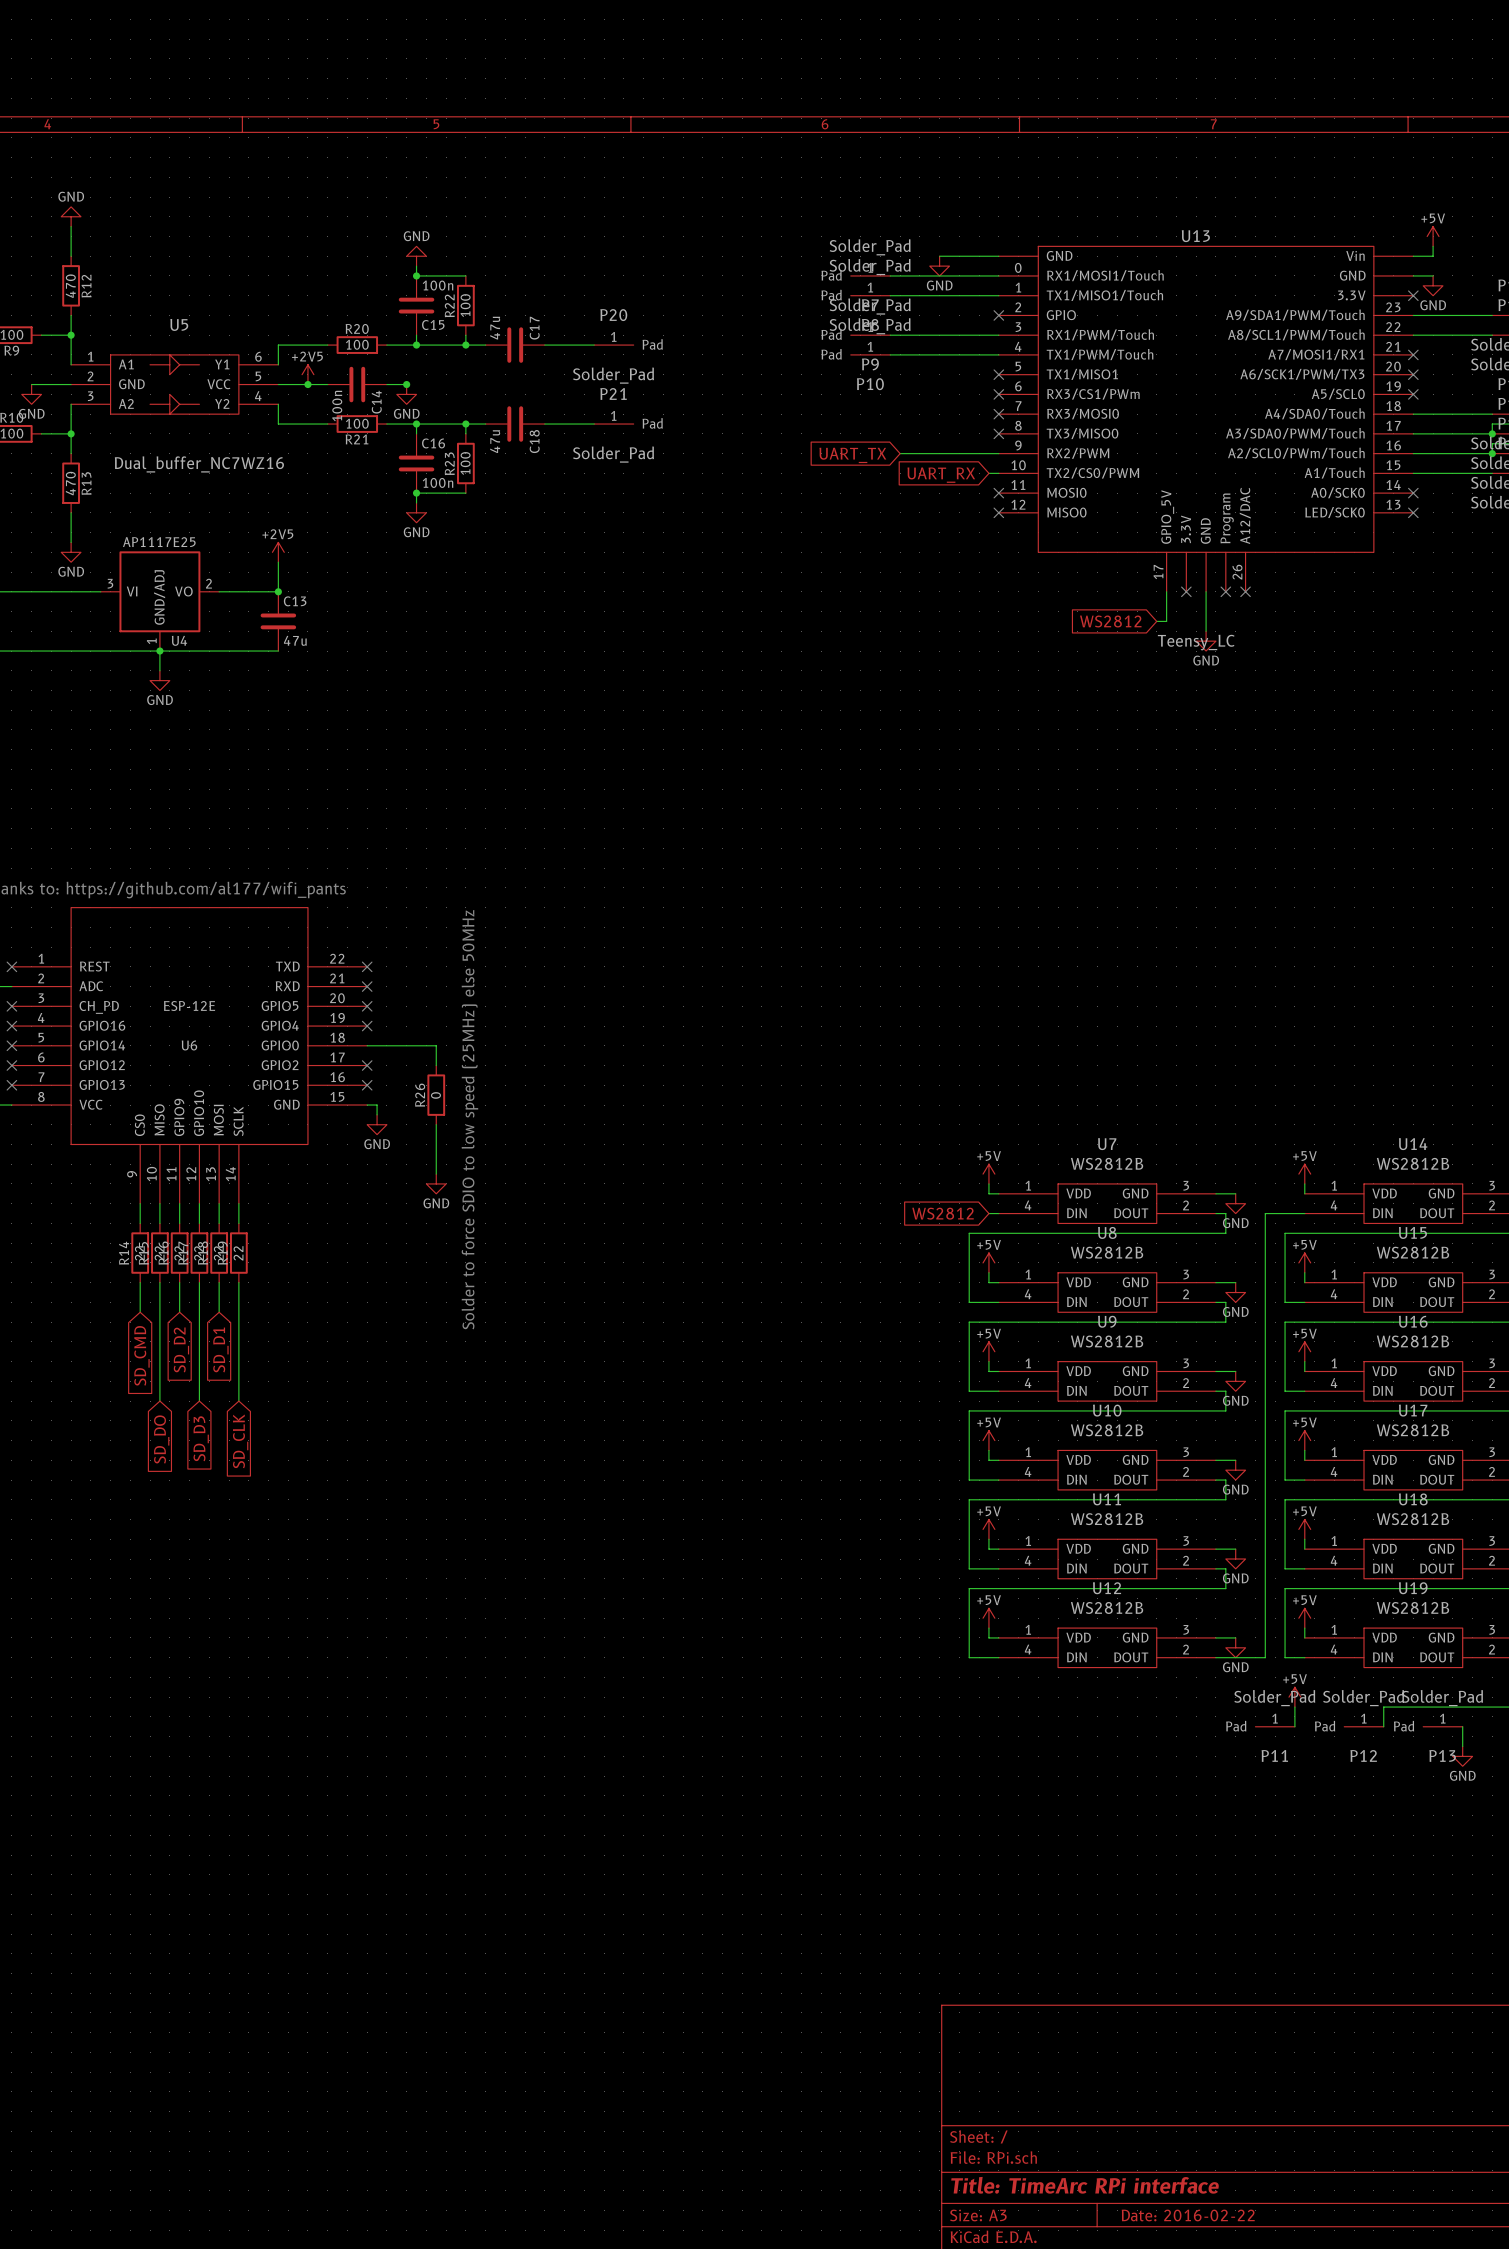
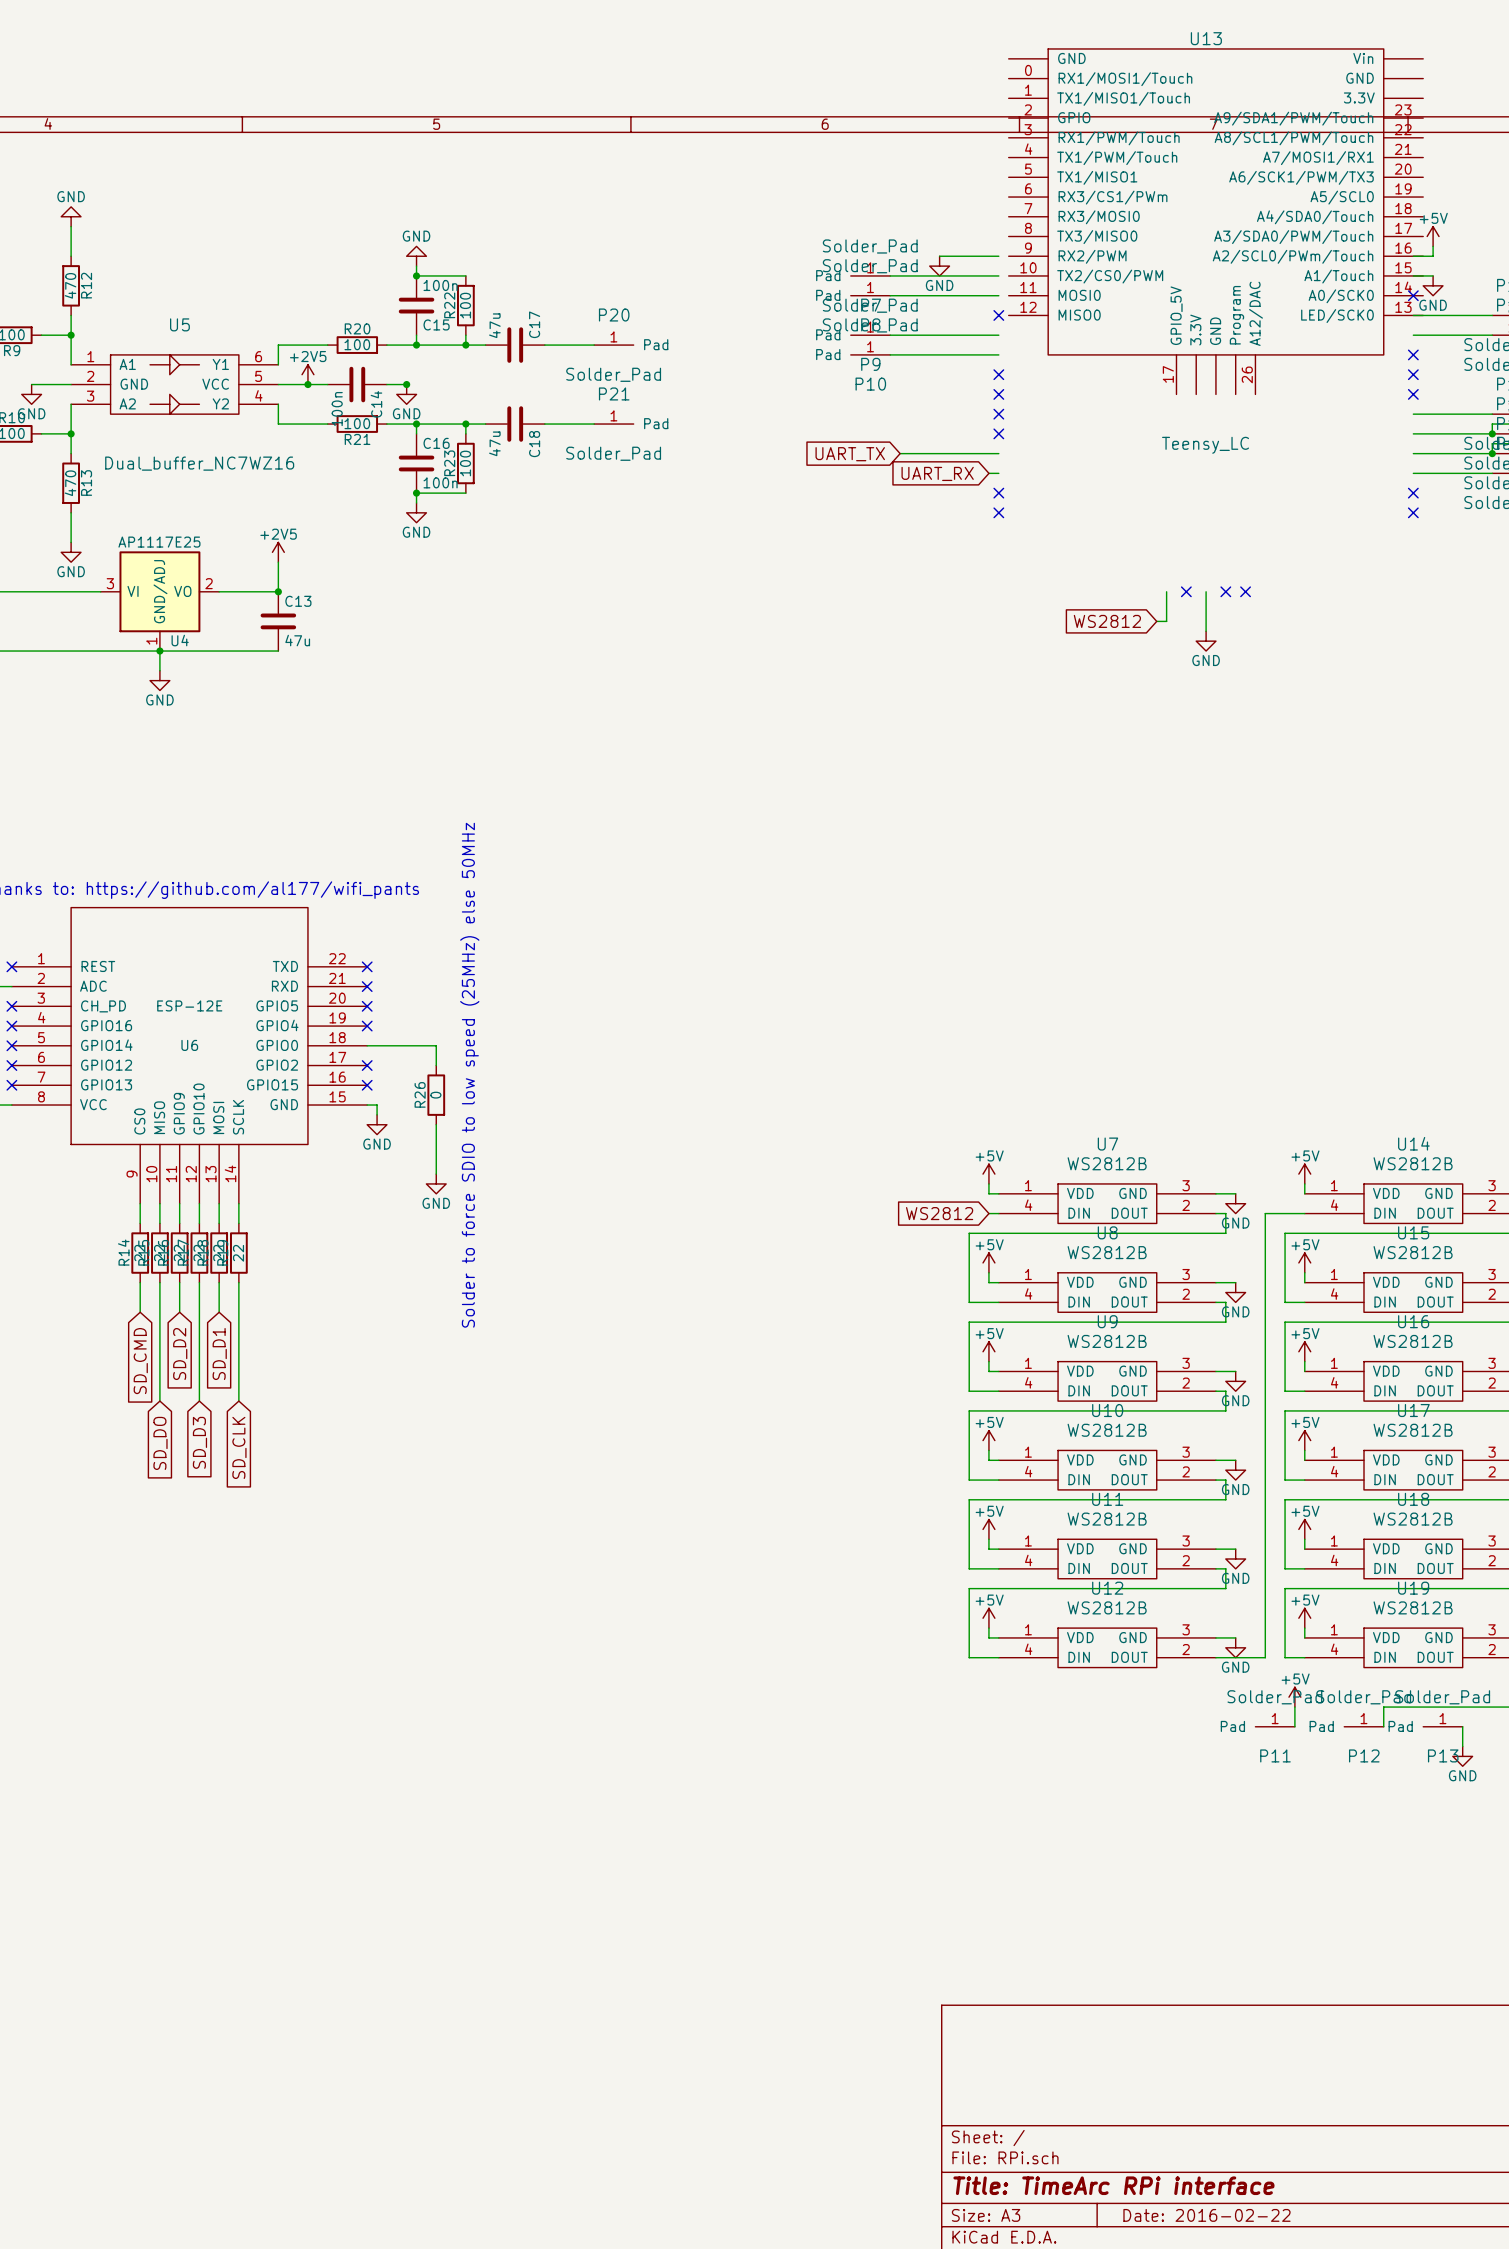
U13 position: (1206, 419) -> (1215, 221)

